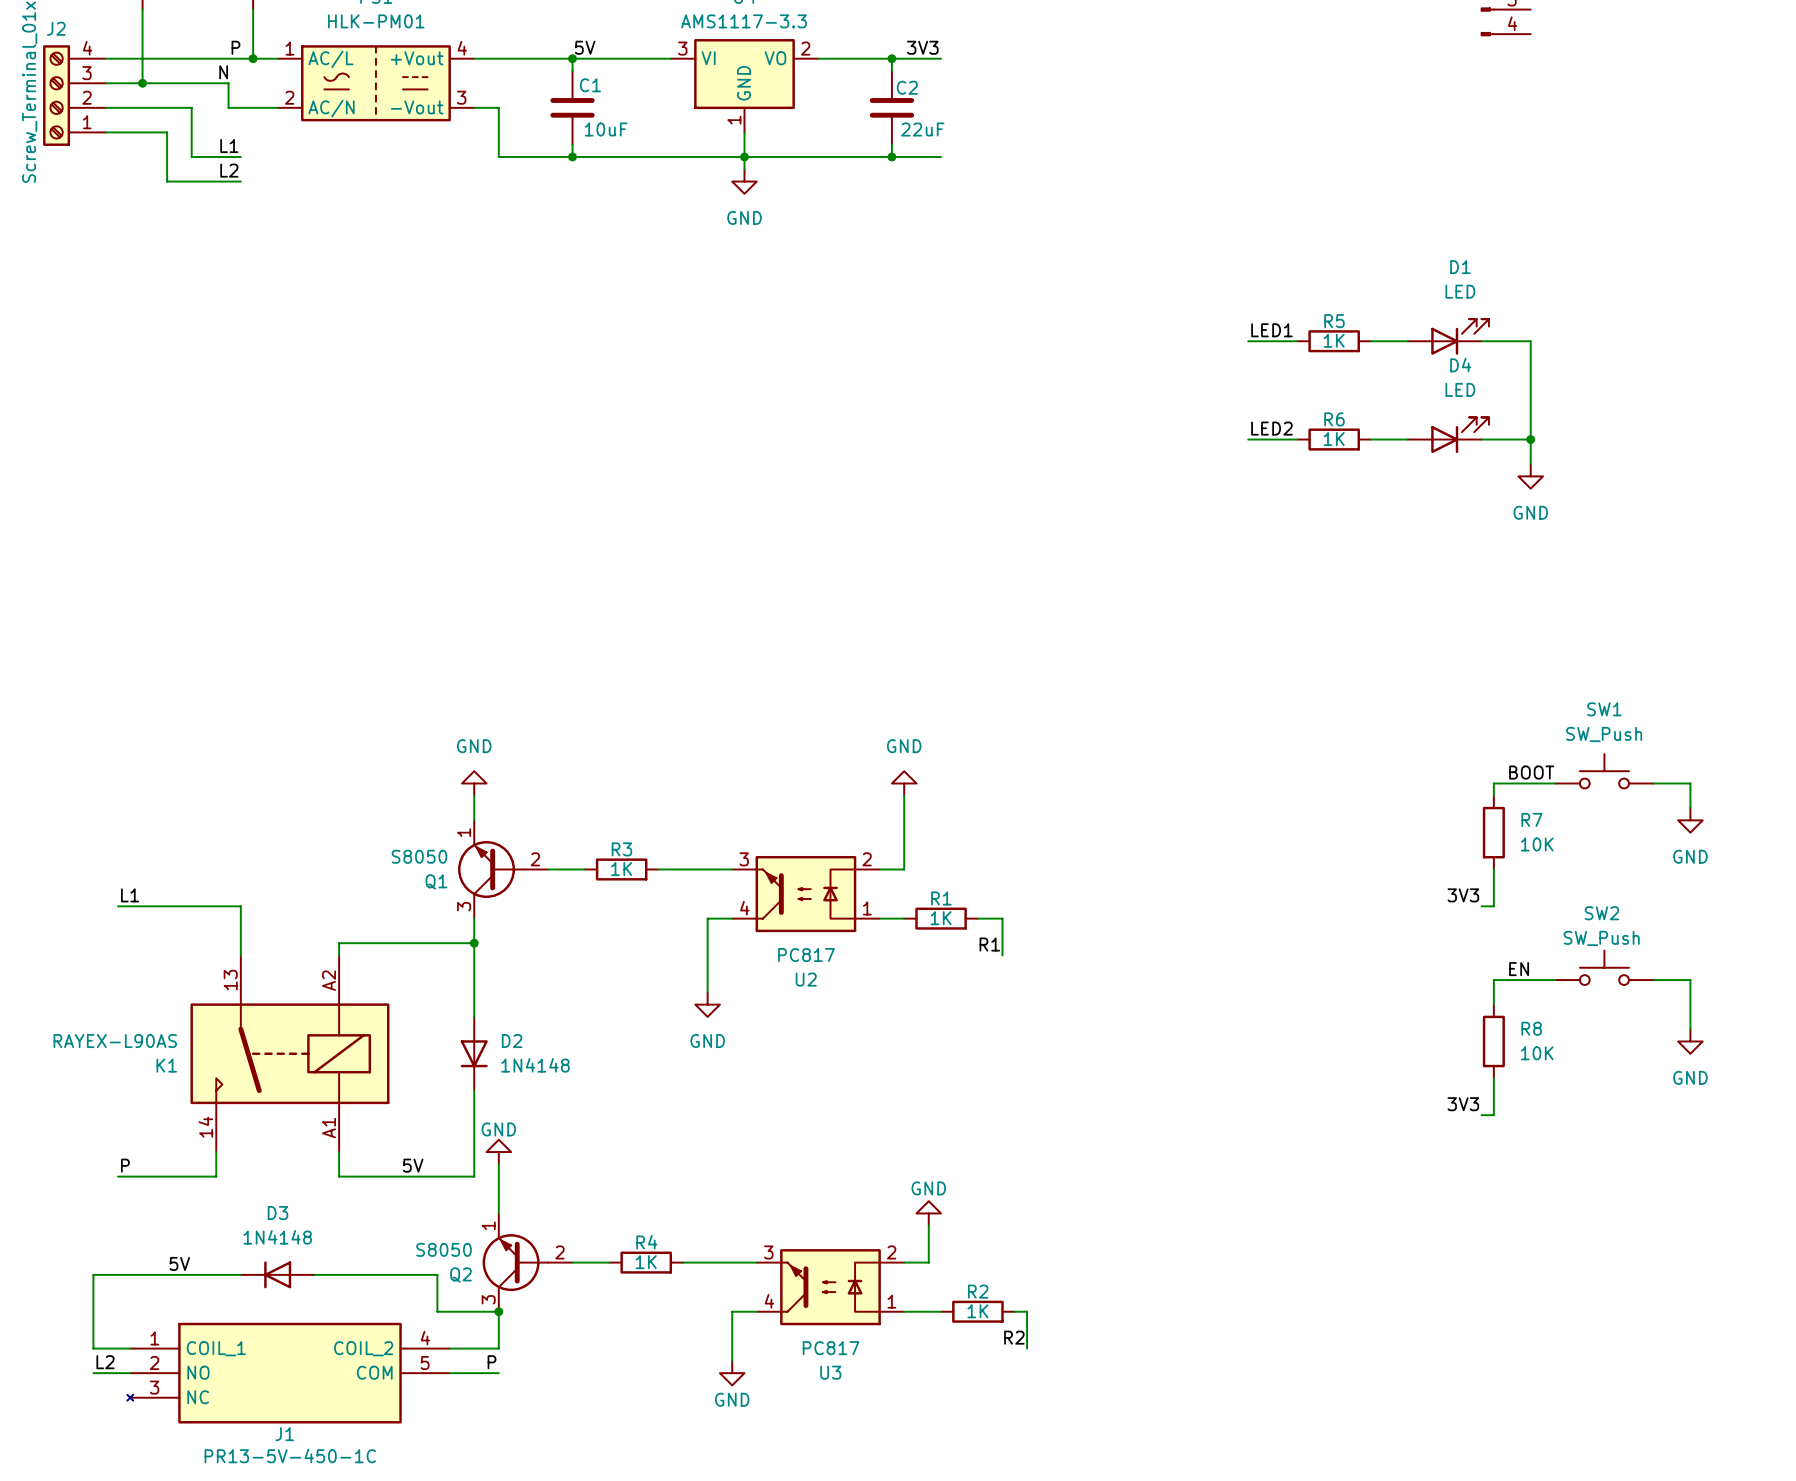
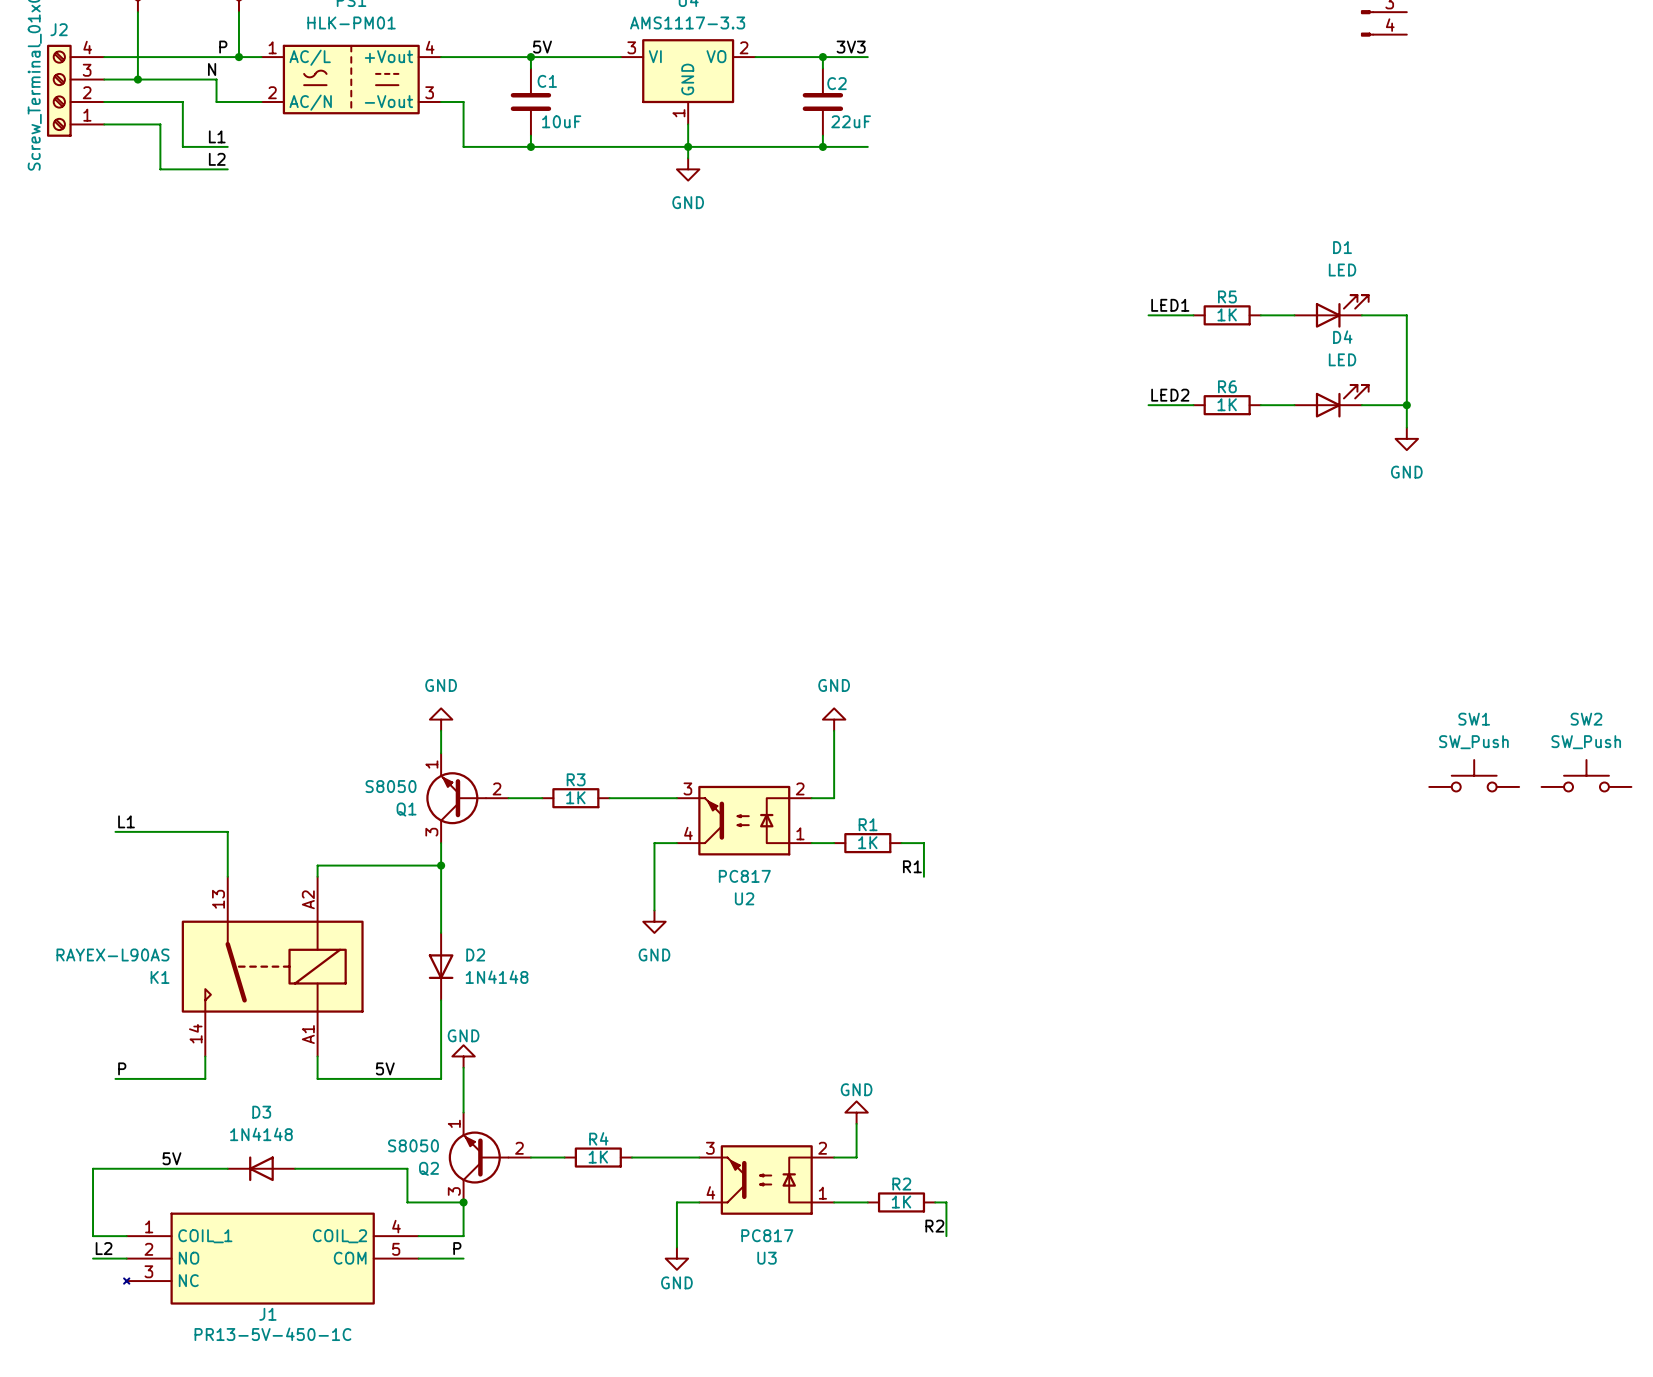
SW1 position: (1604, 771) -> (1474, 775)
label: BOOT (1531, 772) -> none
wire: (1555, 783) (1493, 783) (1493, 795) -> none
wire: (1653, 783) (1690, 783) (1690, 808) -> none
power symbol: GND (1690, 820) -> none
R7: 10K (1493, 832) -> none
wire: (1493, 869) (1493, 906) (1481, 906) -> none
label: 3V3 (1463, 895) -> none
SW2 name position: SW2 (1601, 913) -> SW2 (1586, 719)
SW2 value position: SW_Push (1601, 938) -> SW_Push (1586, 742)
SW2 position: (1604, 967) -> (1586, 775)
label: EN (1519, 969) -> none
wire: (1555, 980) (1493, 980) (1493, 1004) -> none
wire: (1653, 980) (1690, 980) (1690, 1029) -> none
R8: 10K (1493, 1041) -> none
power symbol: GND (1690, 1041) -> none
wire: (1493, 1078) (1493, 1115) (1481, 1115) -> none
label: 3V3 (1463, 1104) -> none

